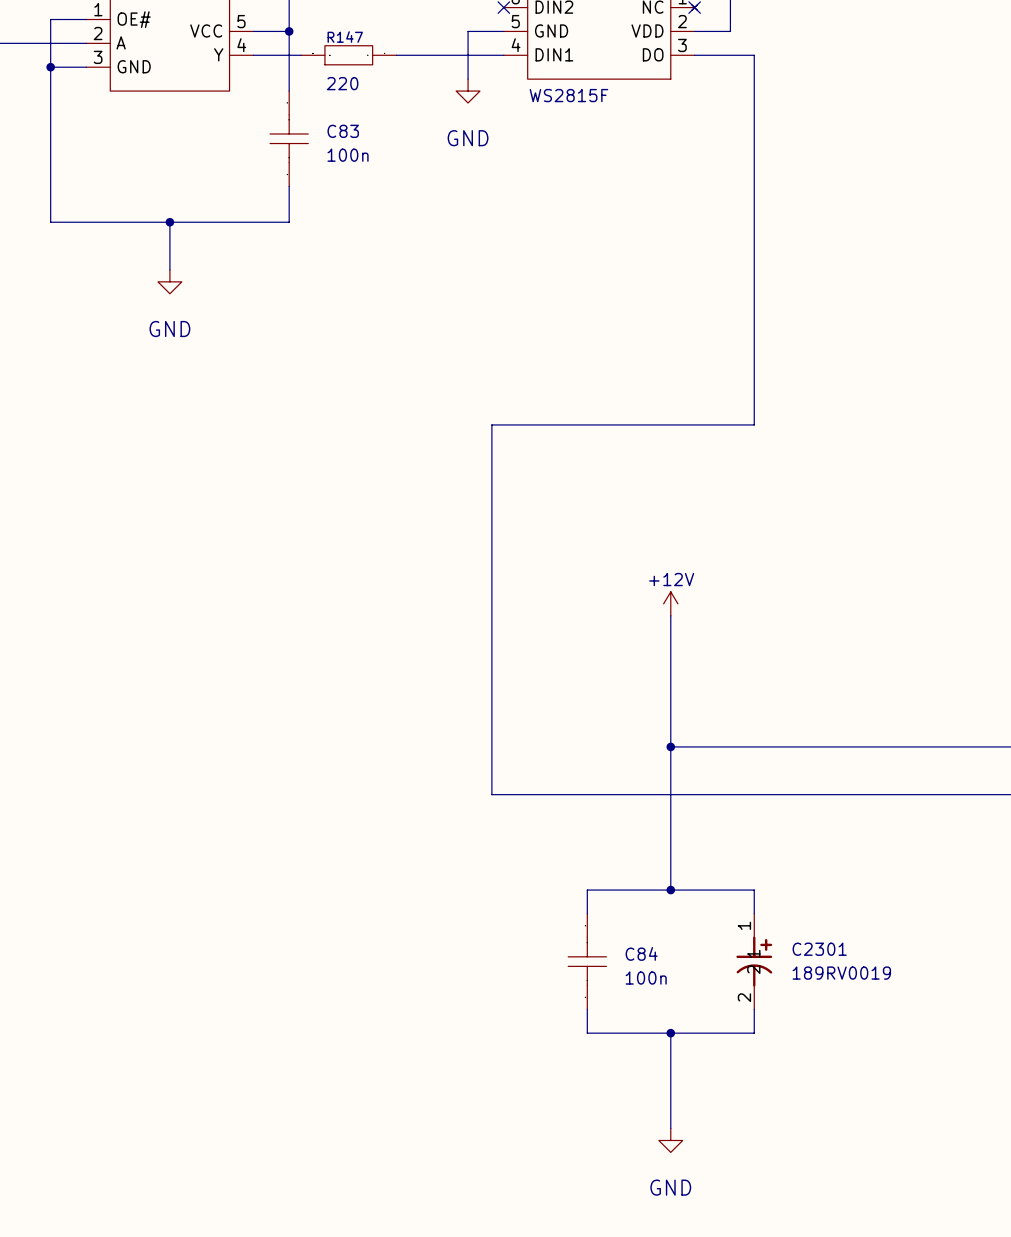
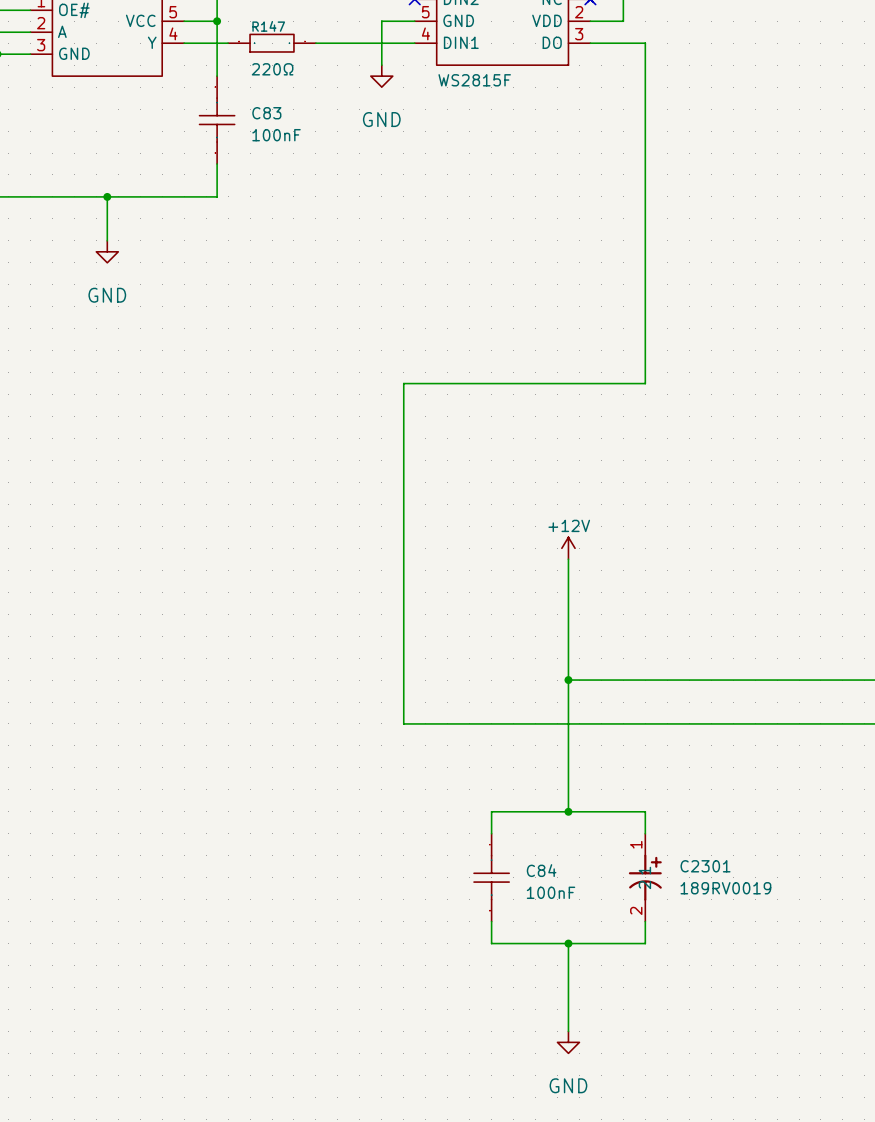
R147 value: 220 (342, 83) -> 220Ω (272, 69)
C83 value: 100n (348, 155) -> 100nF (276, 135)
C84 value: 100n (646, 978) -> 100nF (551, 892)

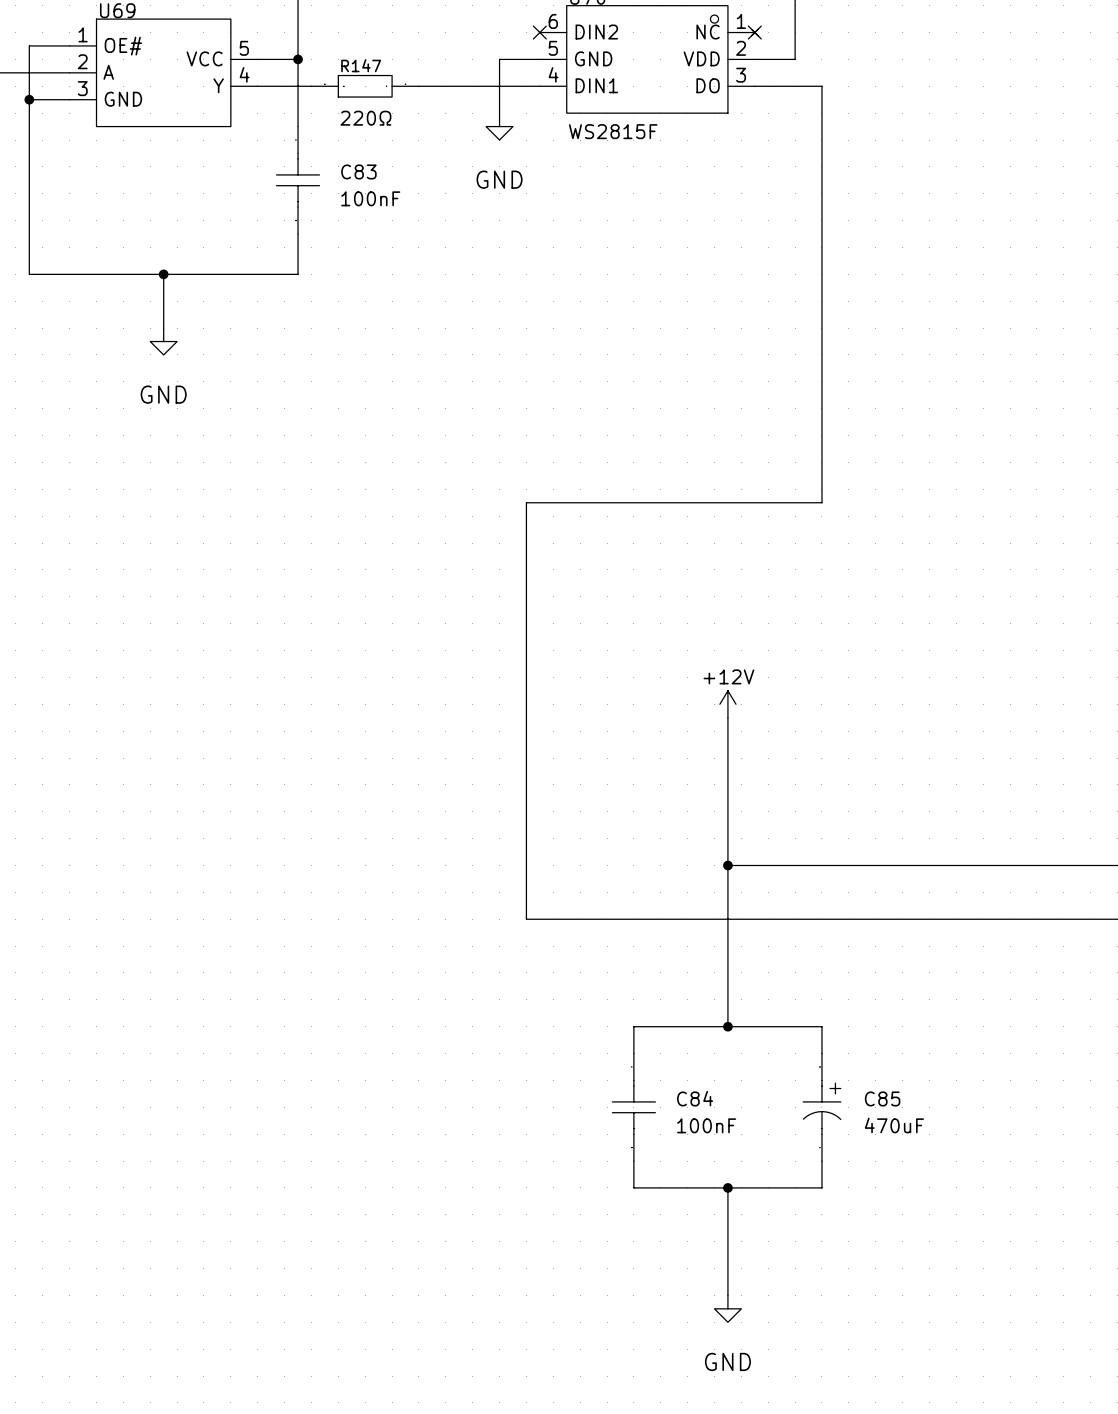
C2301: 189RV0019 (645, 877) -> none
C85: none -> 470uF (821, 1107)

